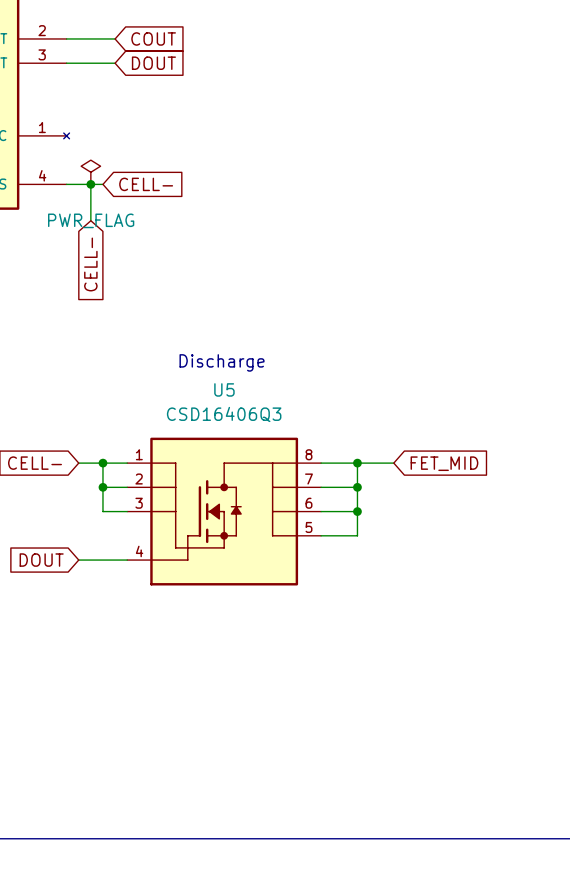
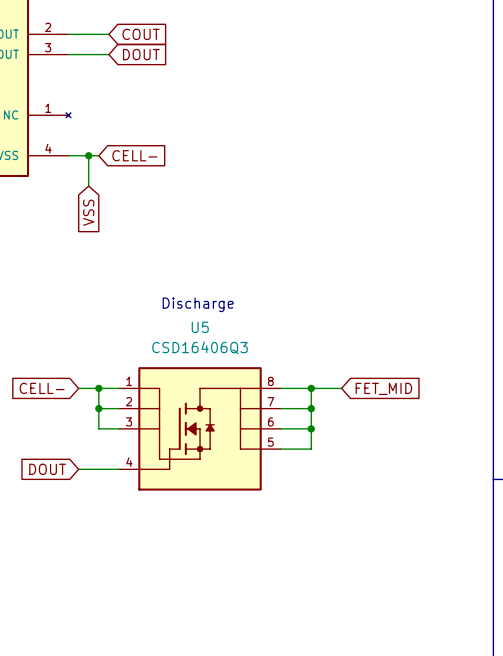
power symbol: PWR_FLAG (90, 172) -> none
global label: CELL- (90, 264) -> VSS (88, 212)

